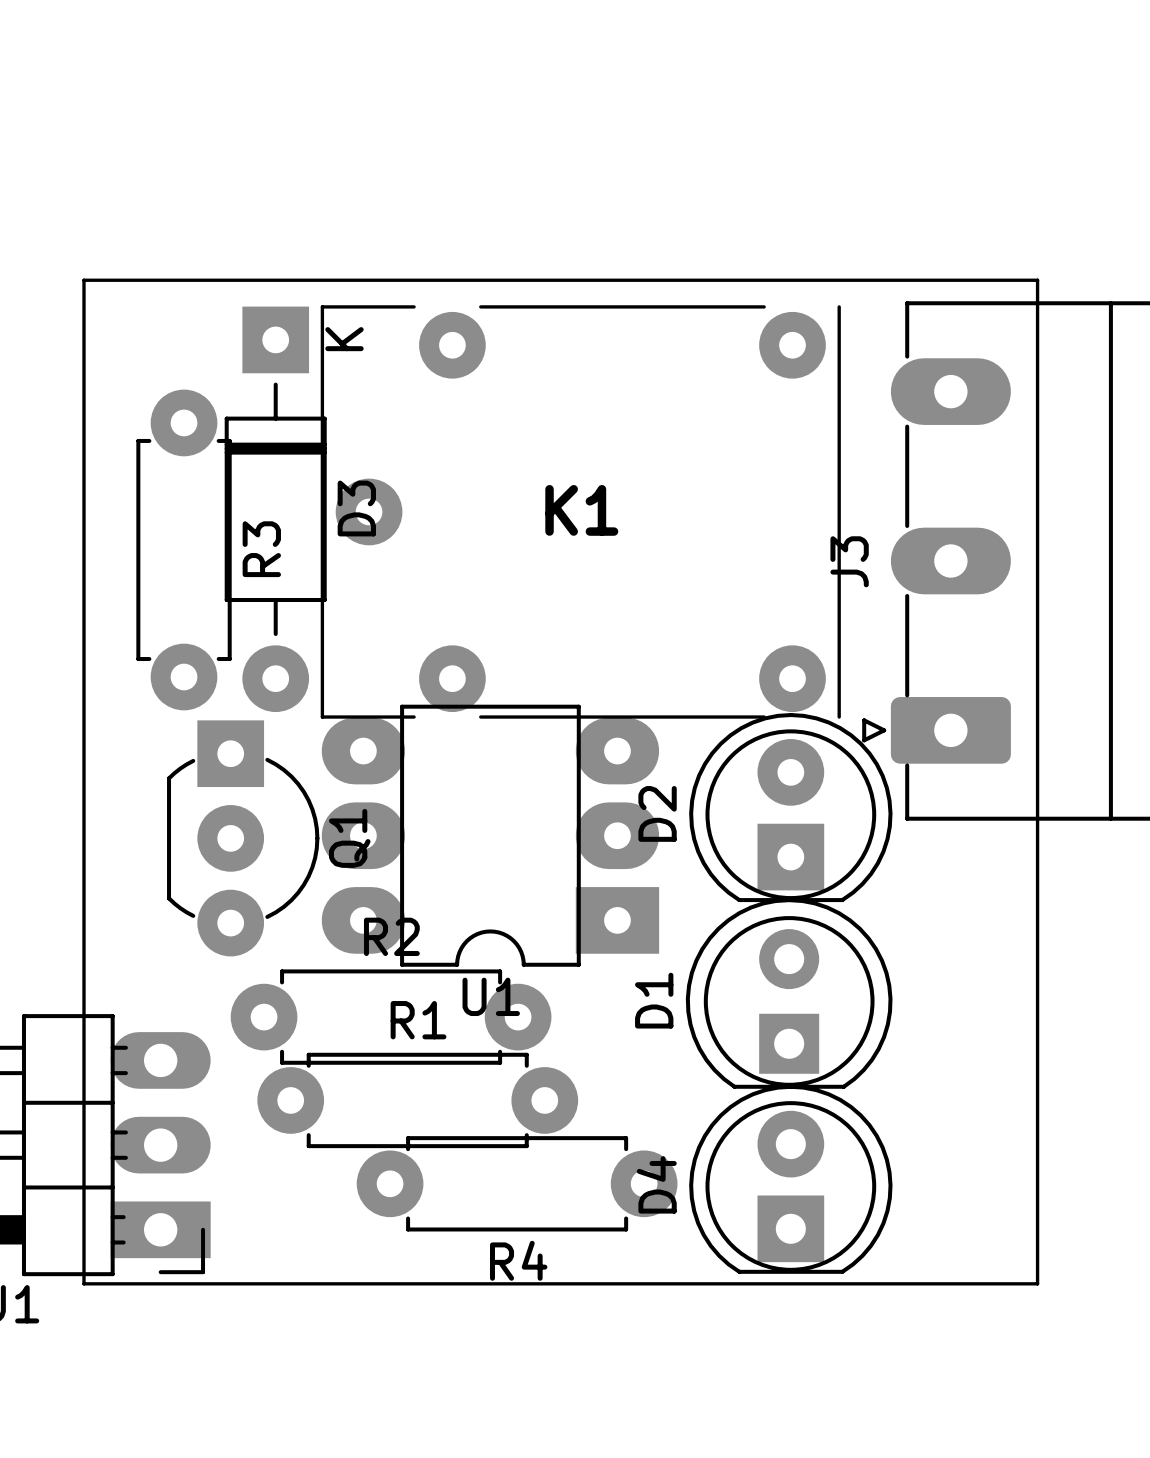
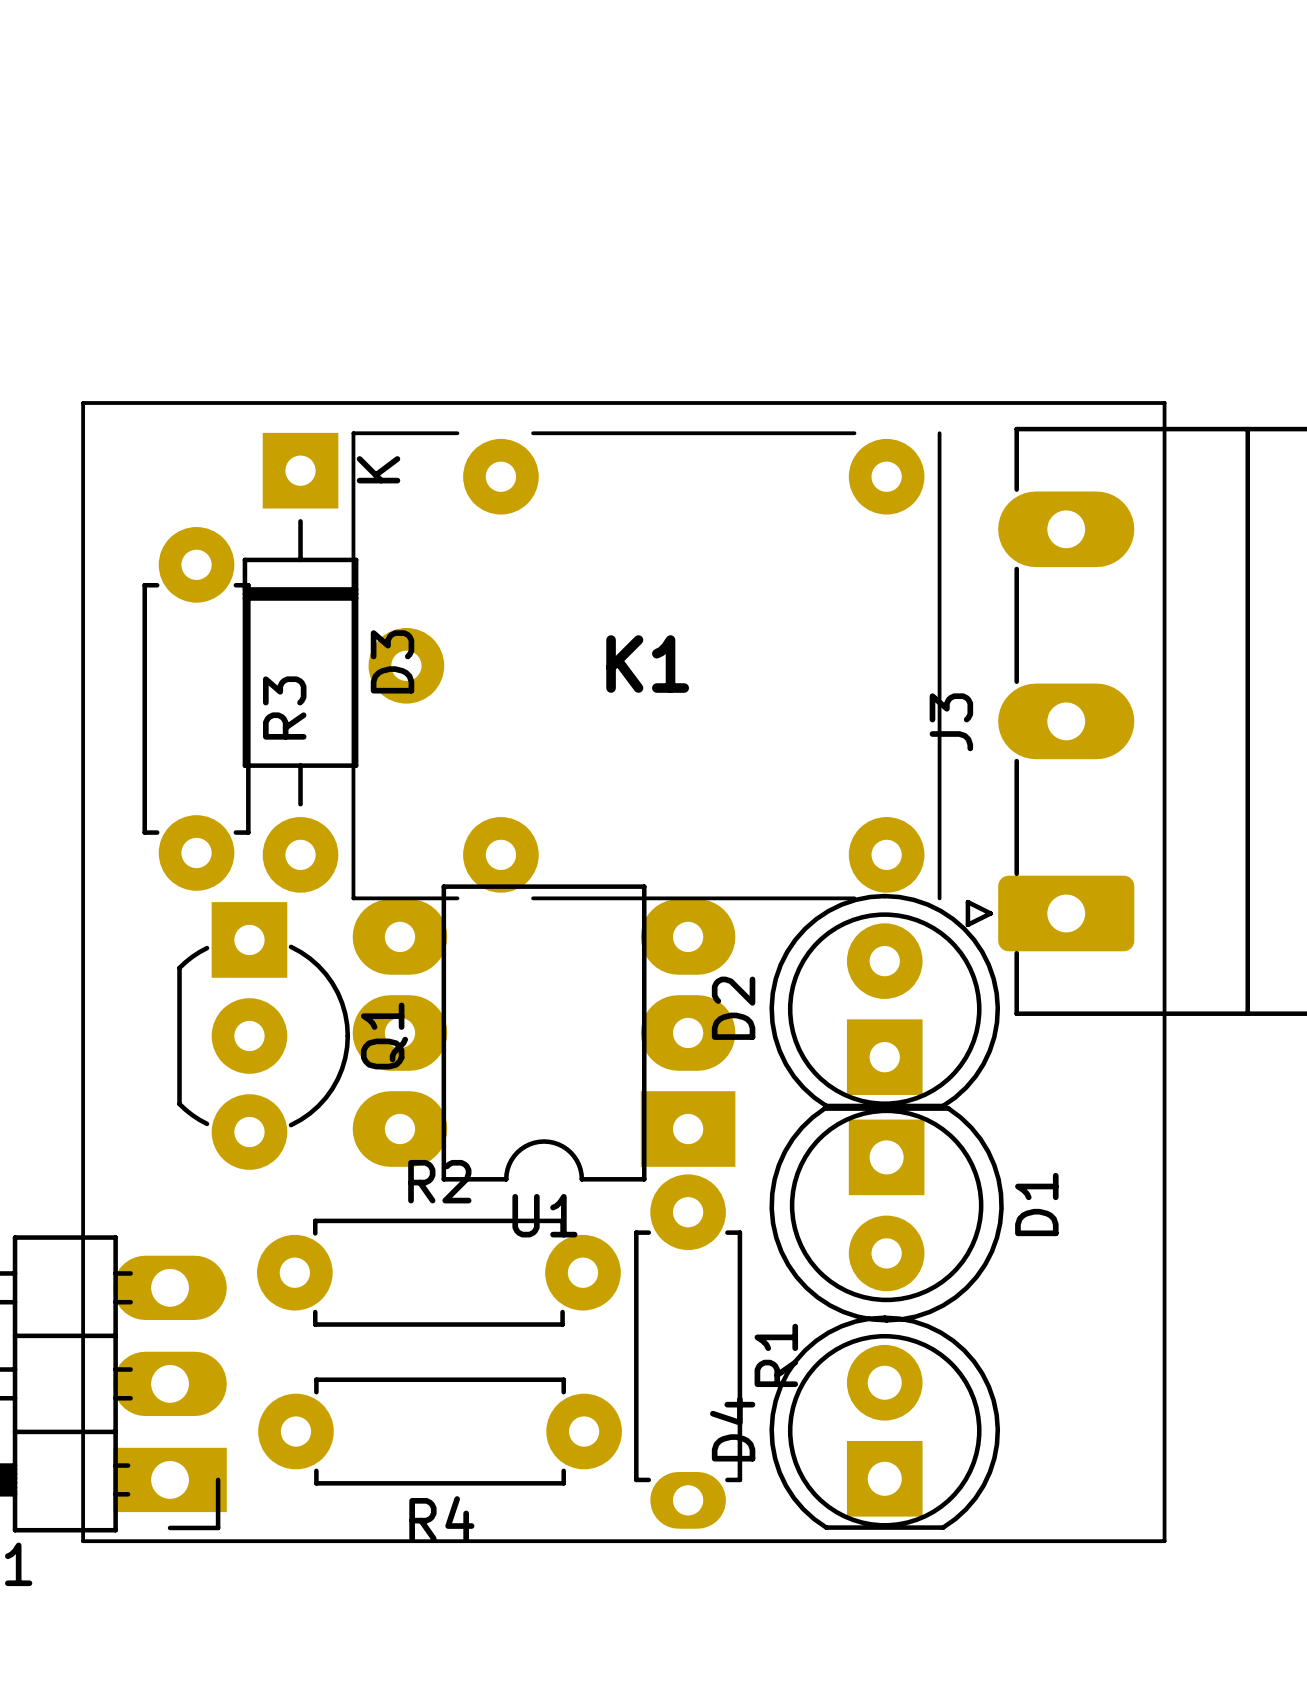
D1 footprint: [685, 898, 893, 1089] -> [769, 1106, 1004, 1323]
D1 name position: D1 (654, 1000) -> D1 (1036, 1204)
R2 position: (391, 1017) -> (438, 1272)
R1 name position: R1 (418, 1020) -> R1 (776, 1355)
R1 footprint: [257, 1052, 579, 1149] -> [634, 1174, 743, 1529]
R4 position: (517, 1183) -> (440, 1431)

